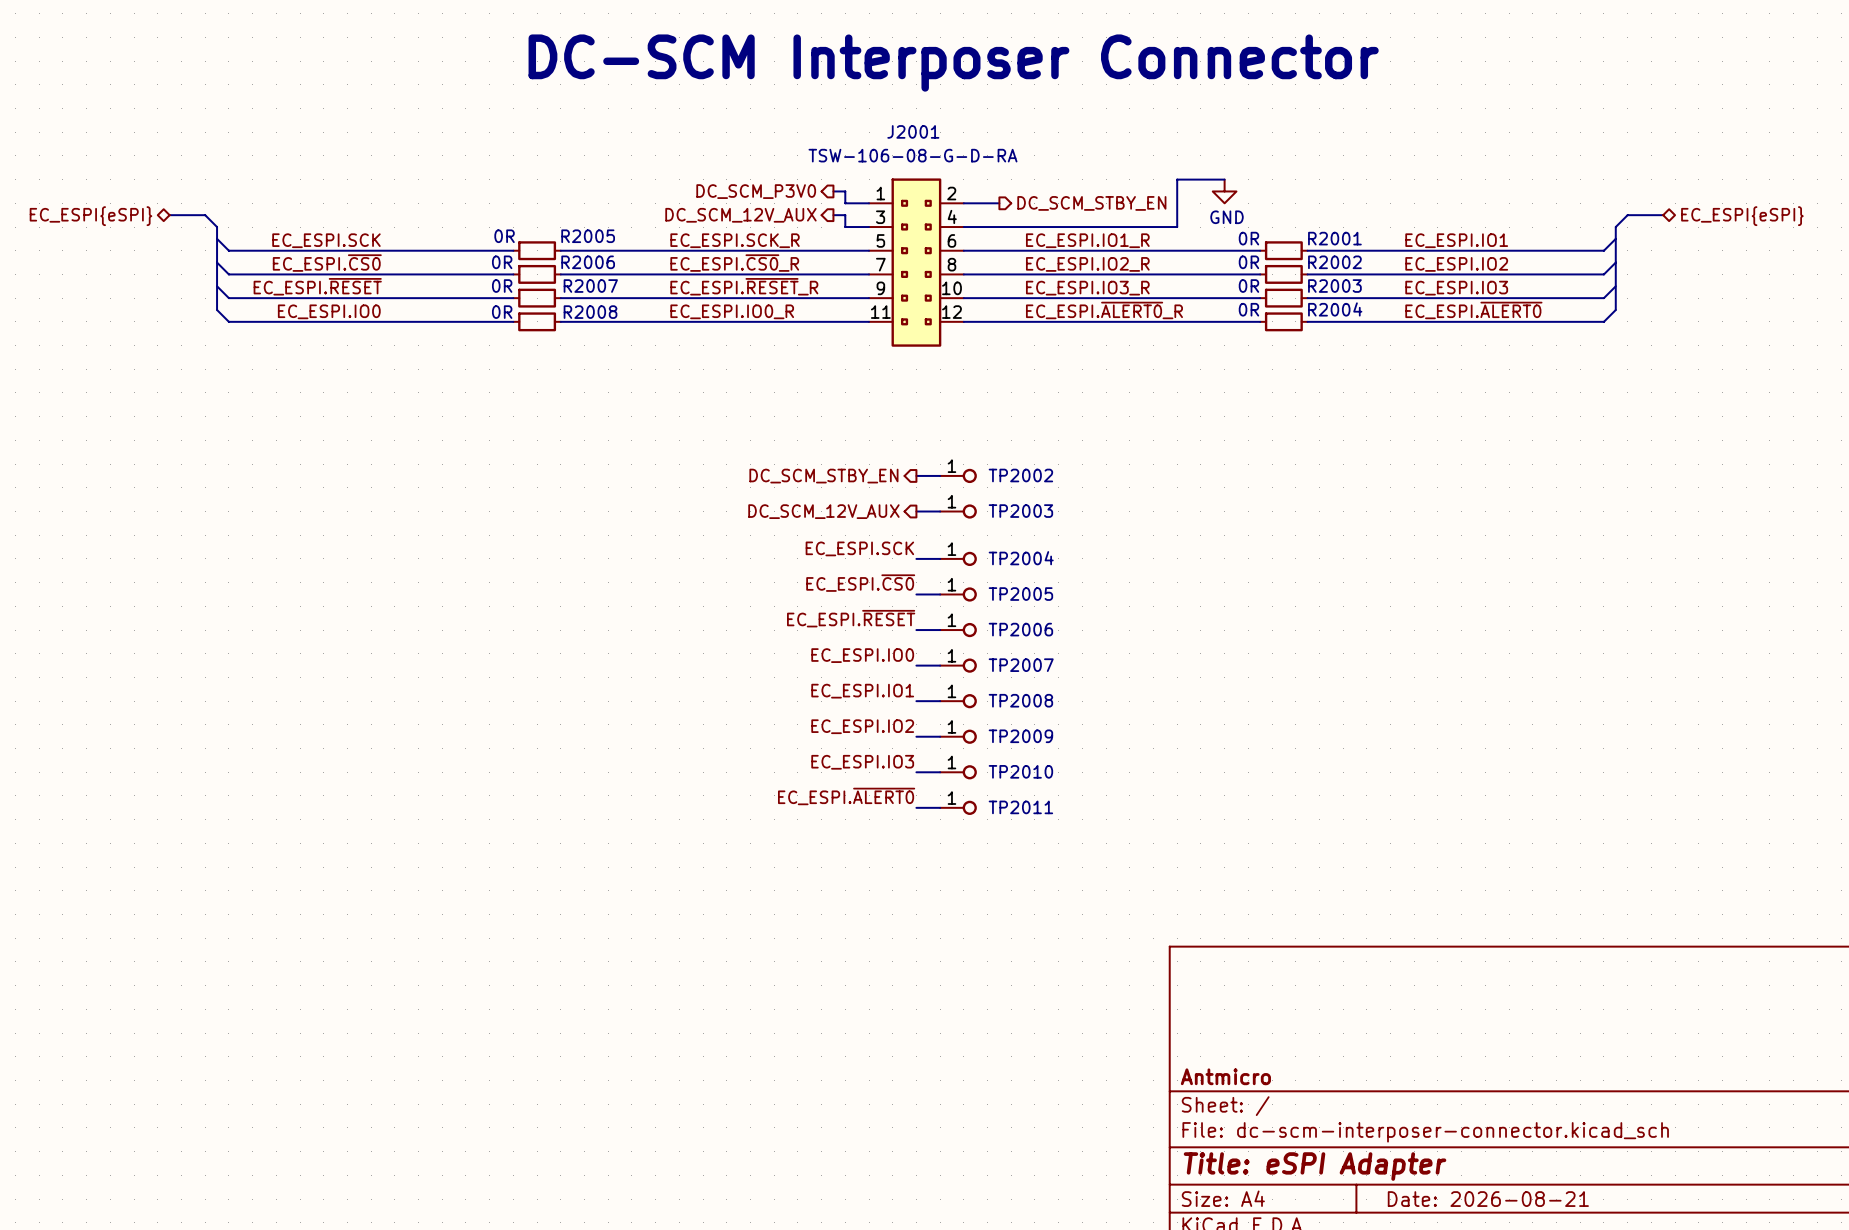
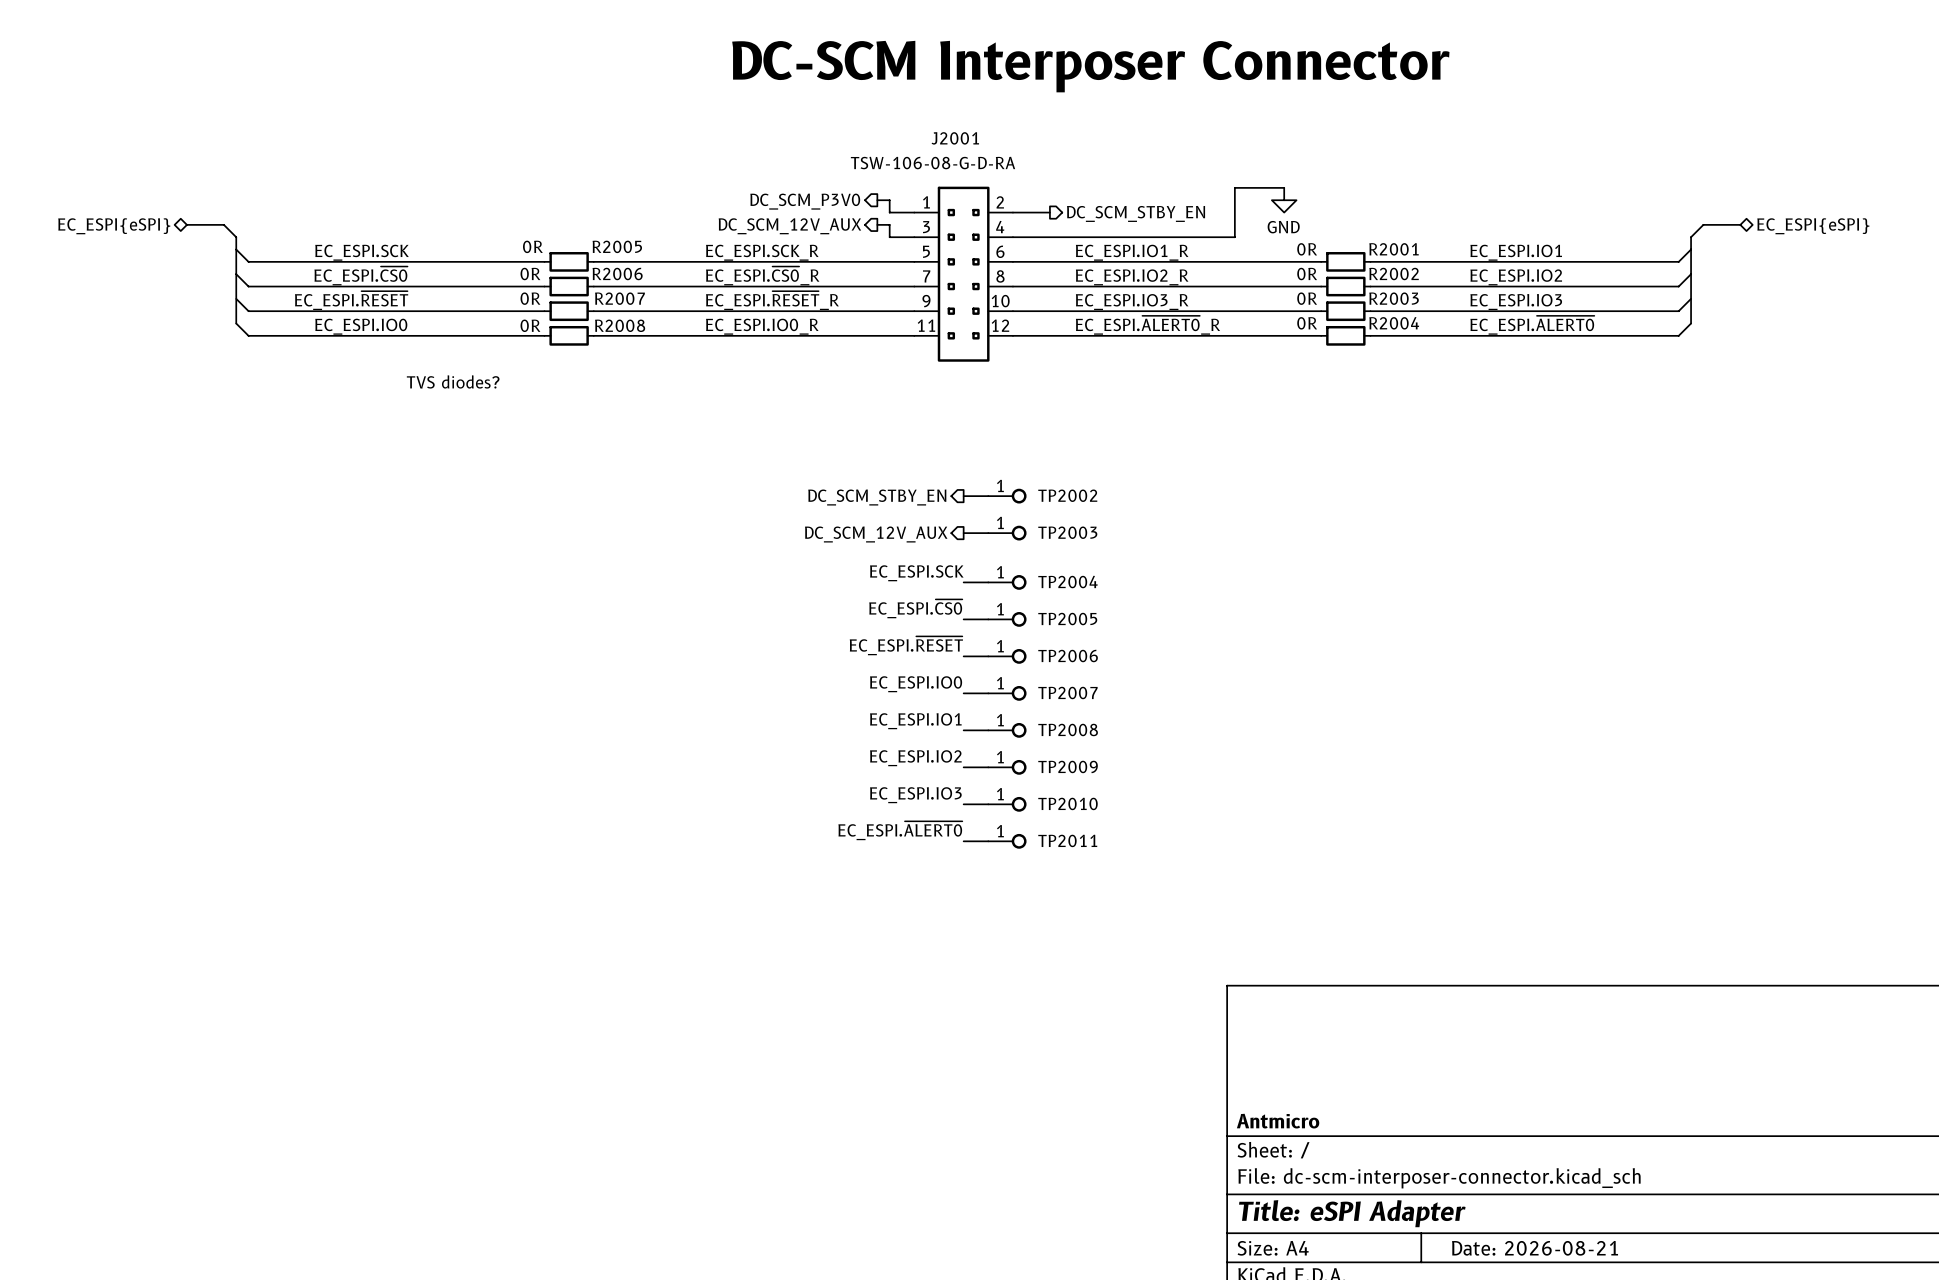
text: none -> TVS diodes? (453, 381)

